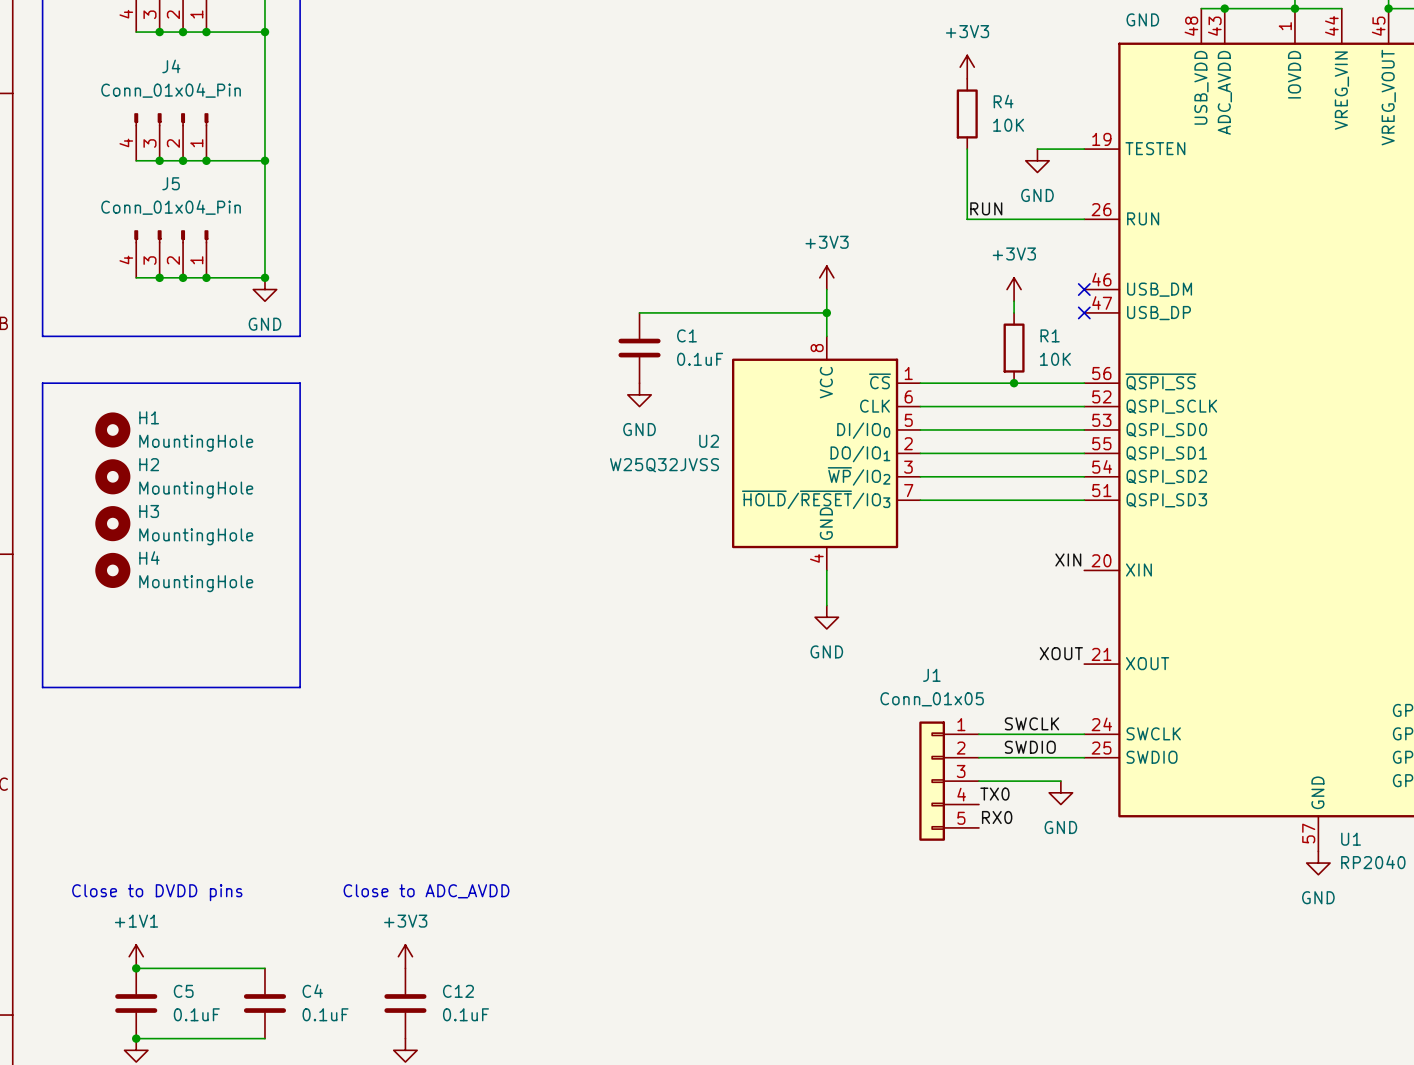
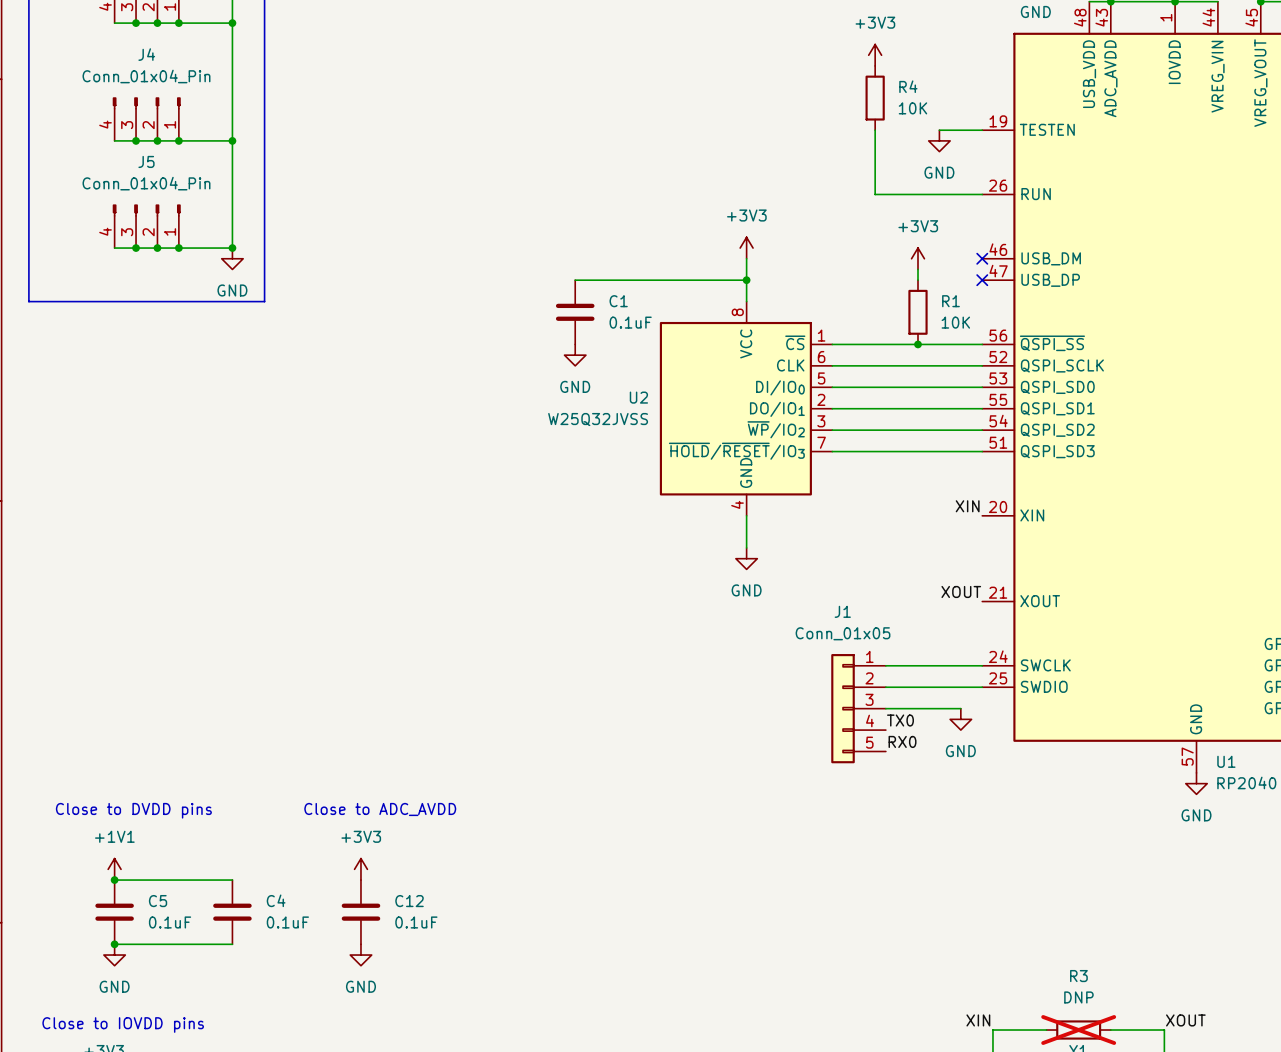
label: RUN (986, 208) -> none
line: (42, 383) (300, 383) (300, 687) (42, 687) (42, 383) -> none
H1: MountingHole (112, 429) -> none
H2: MountingHole (112, 476) -> none
H3: MountingHole (112, 523) -> none
H4: MountingHole (112, 570) -> none
label: SWCLK (1031, 723) -> none
label: SWDIO (1030, 747) -> none

